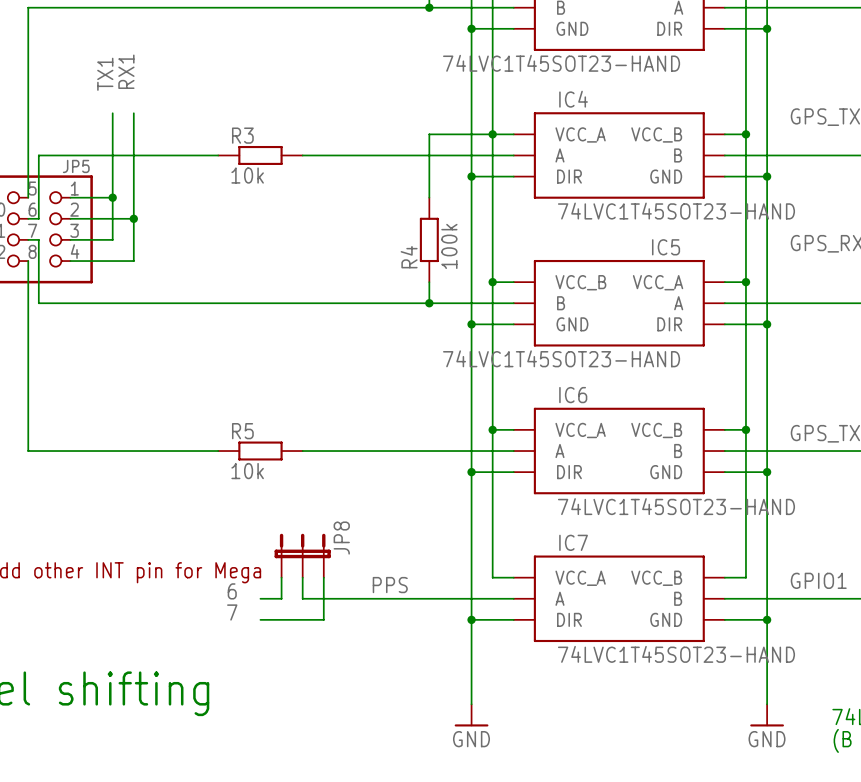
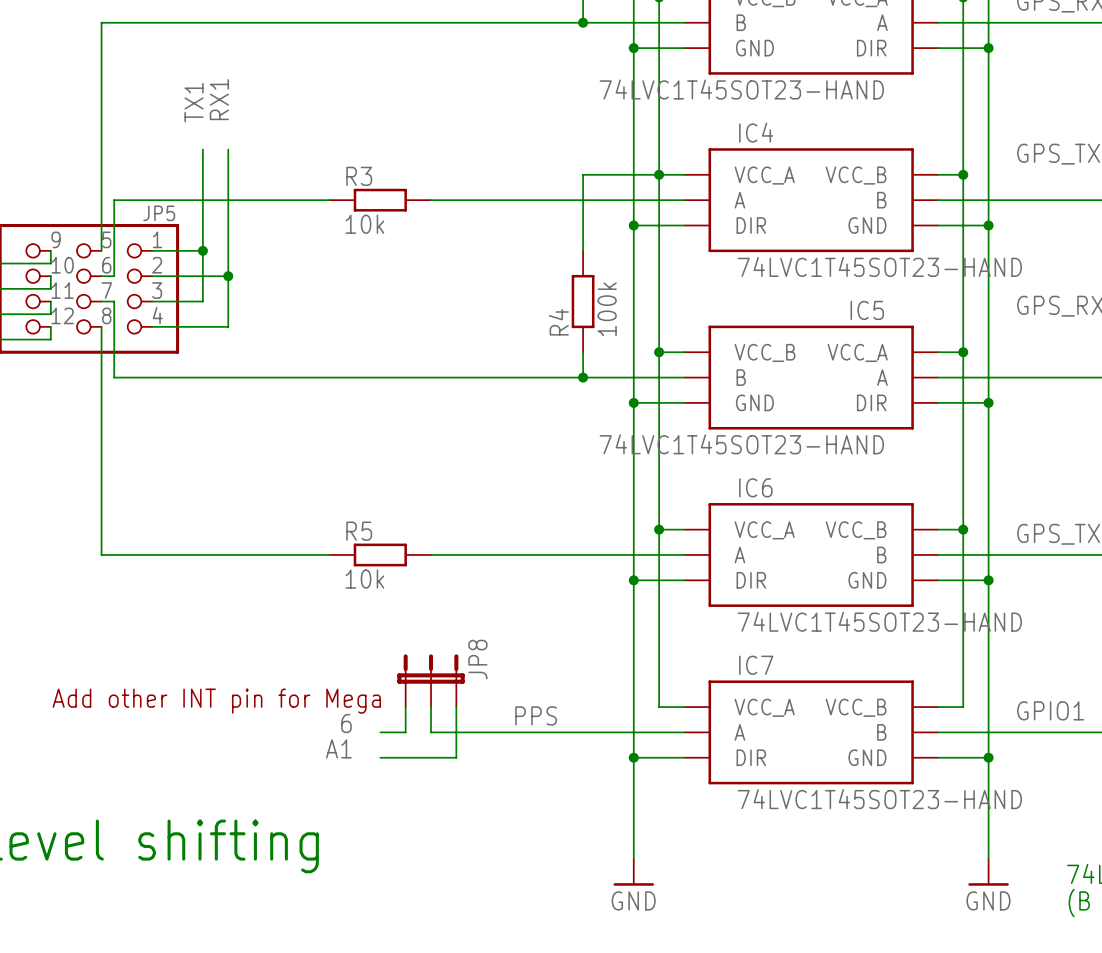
label: 7 (232, 612) -> A1 (338, 748)

